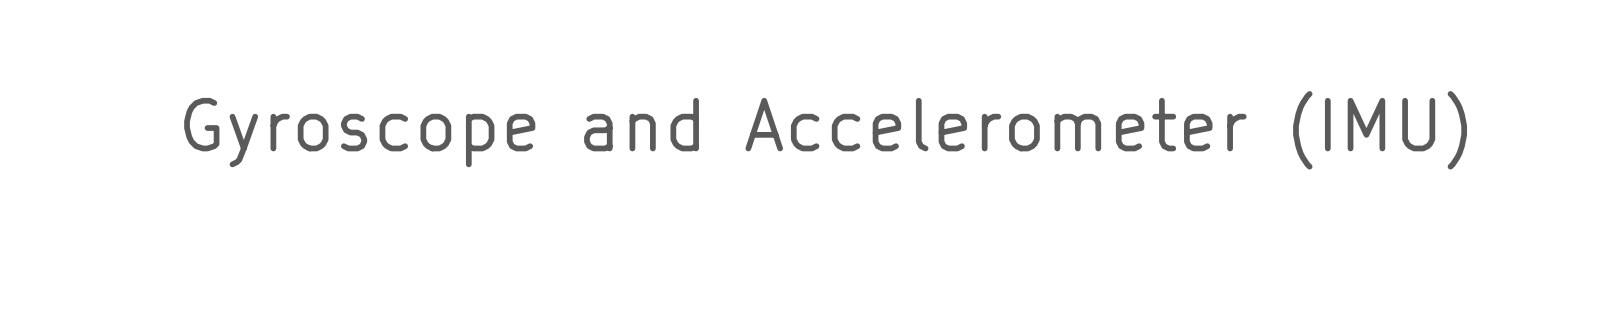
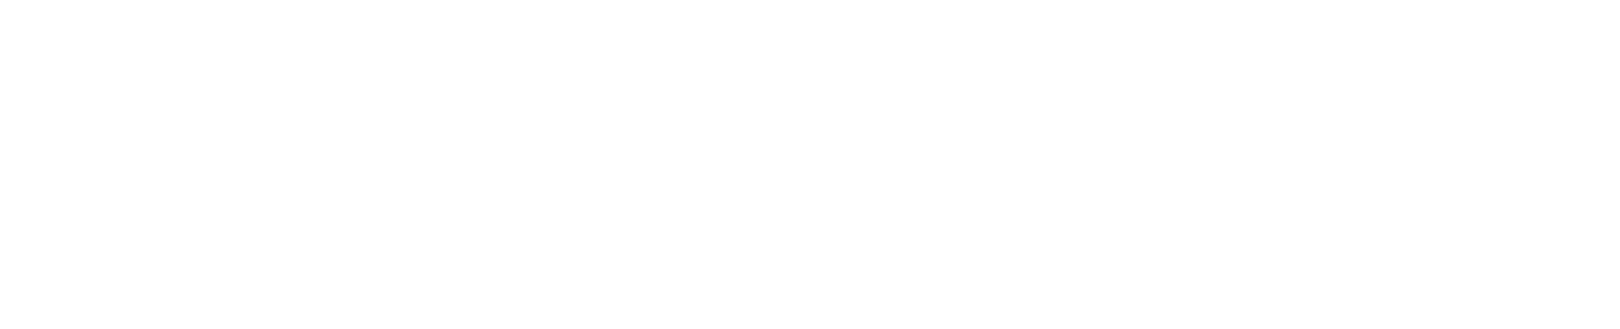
text: Gyroscope and Accelerometer (IMU) (825, 130) -> none

